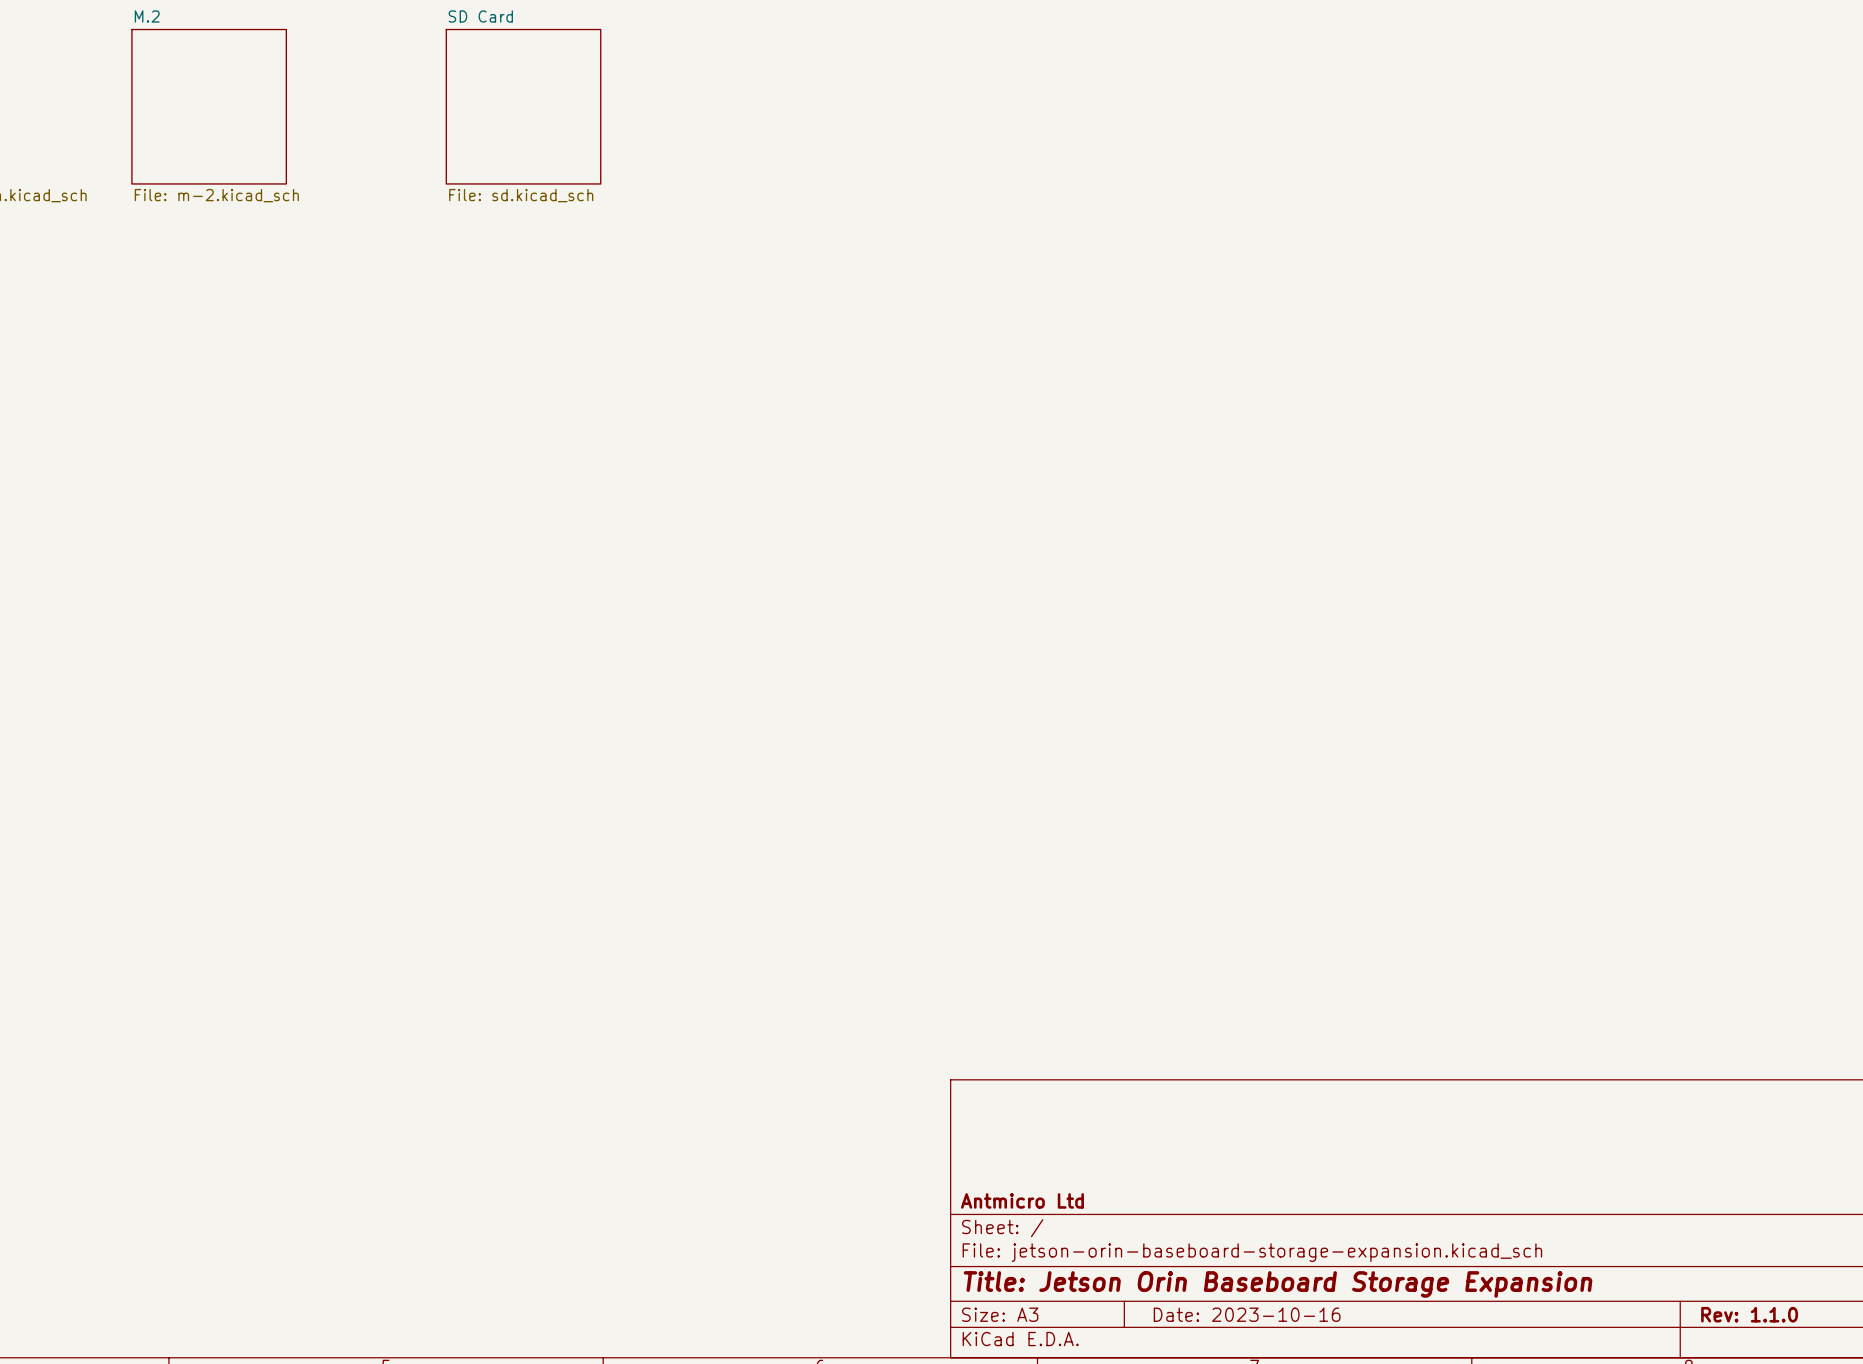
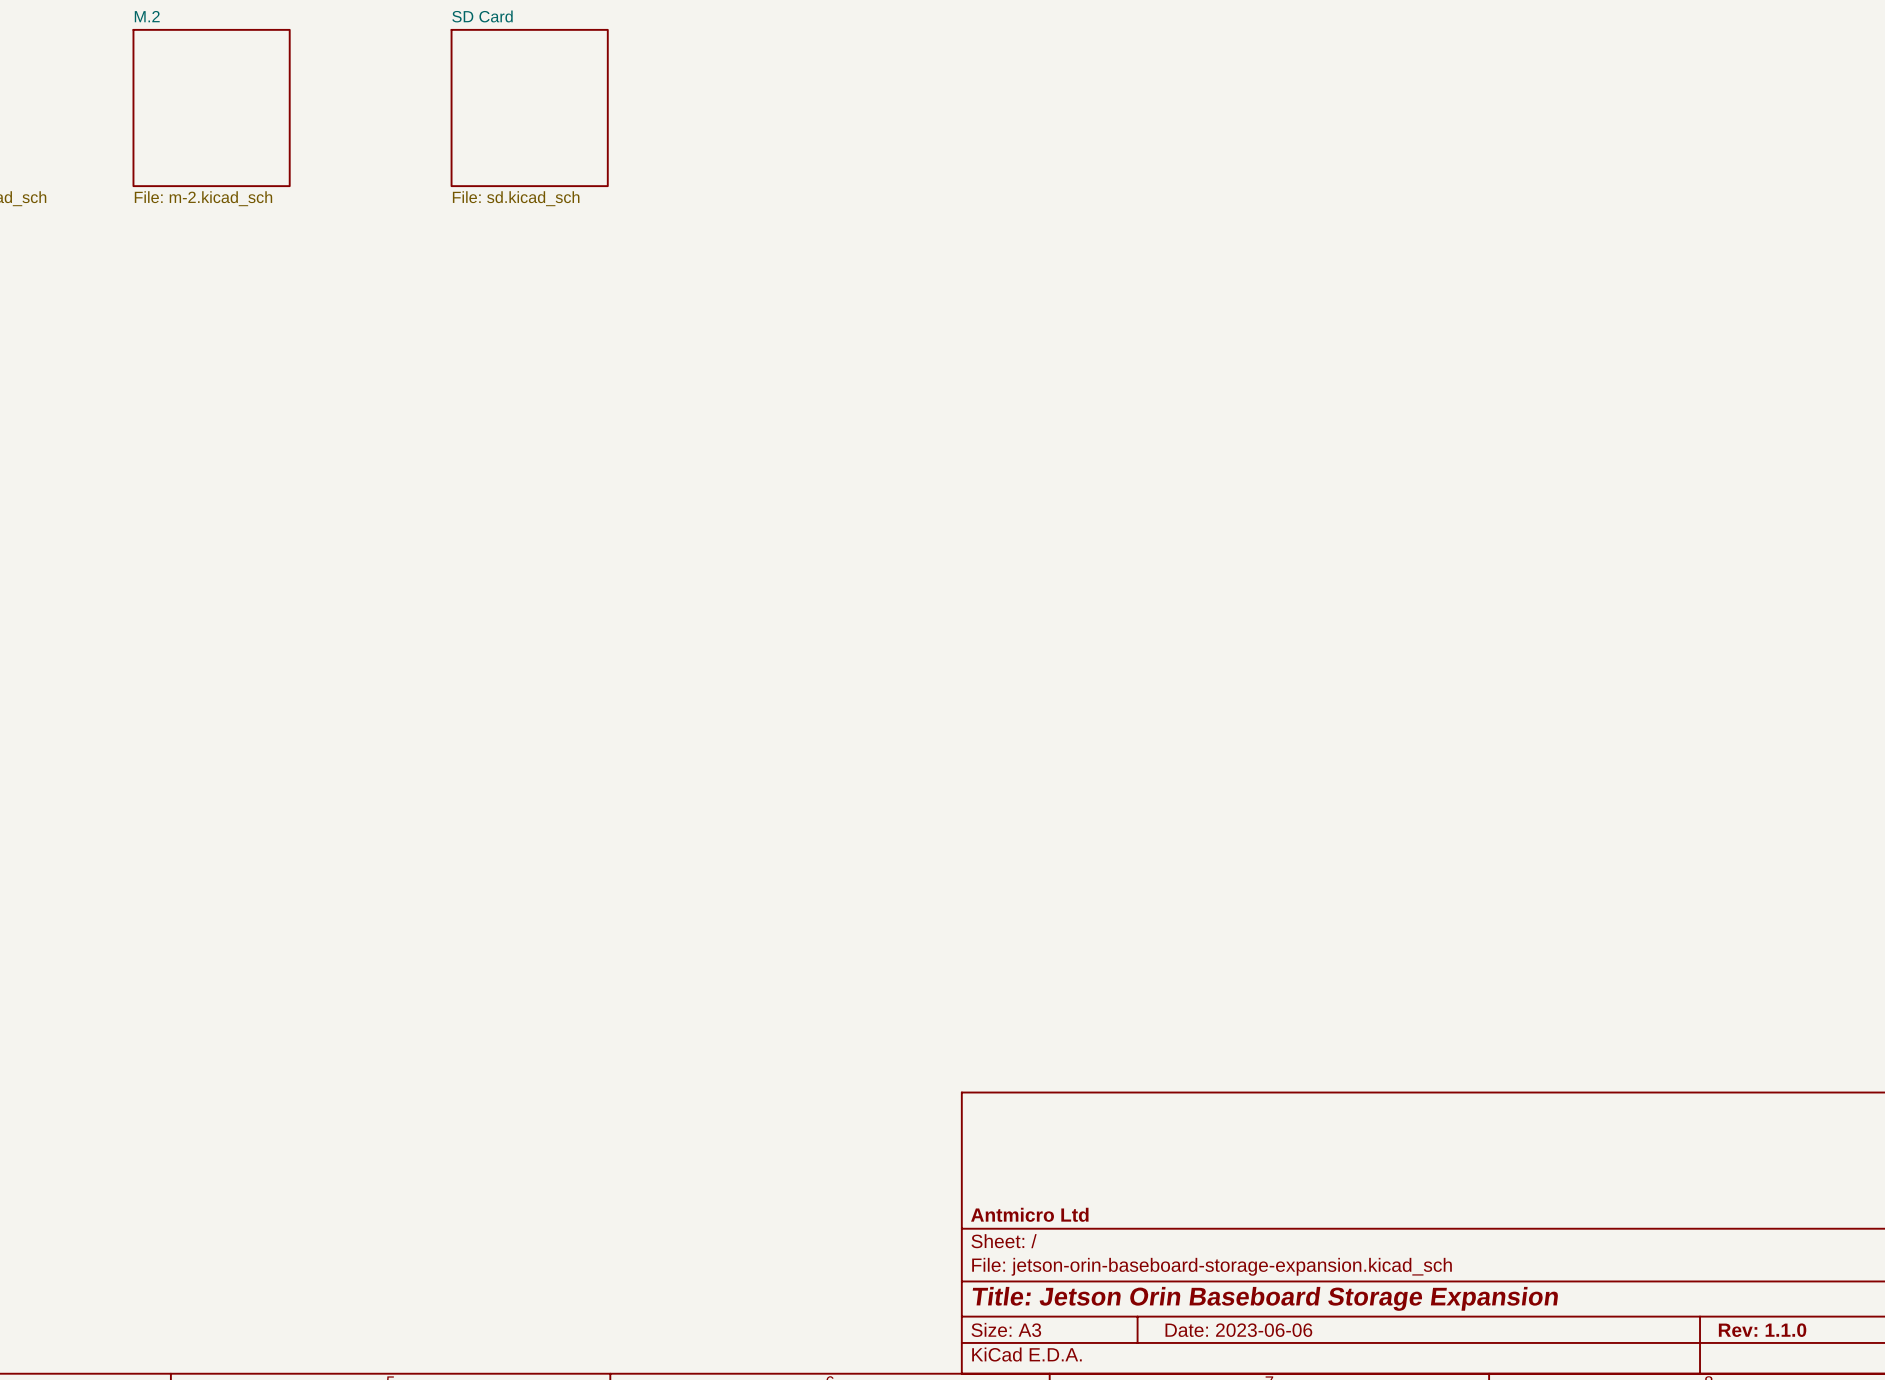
title block: Date: 2023-10-16 (1247, 1314) -> Date: 2023-06-06 (1238, 1330)

